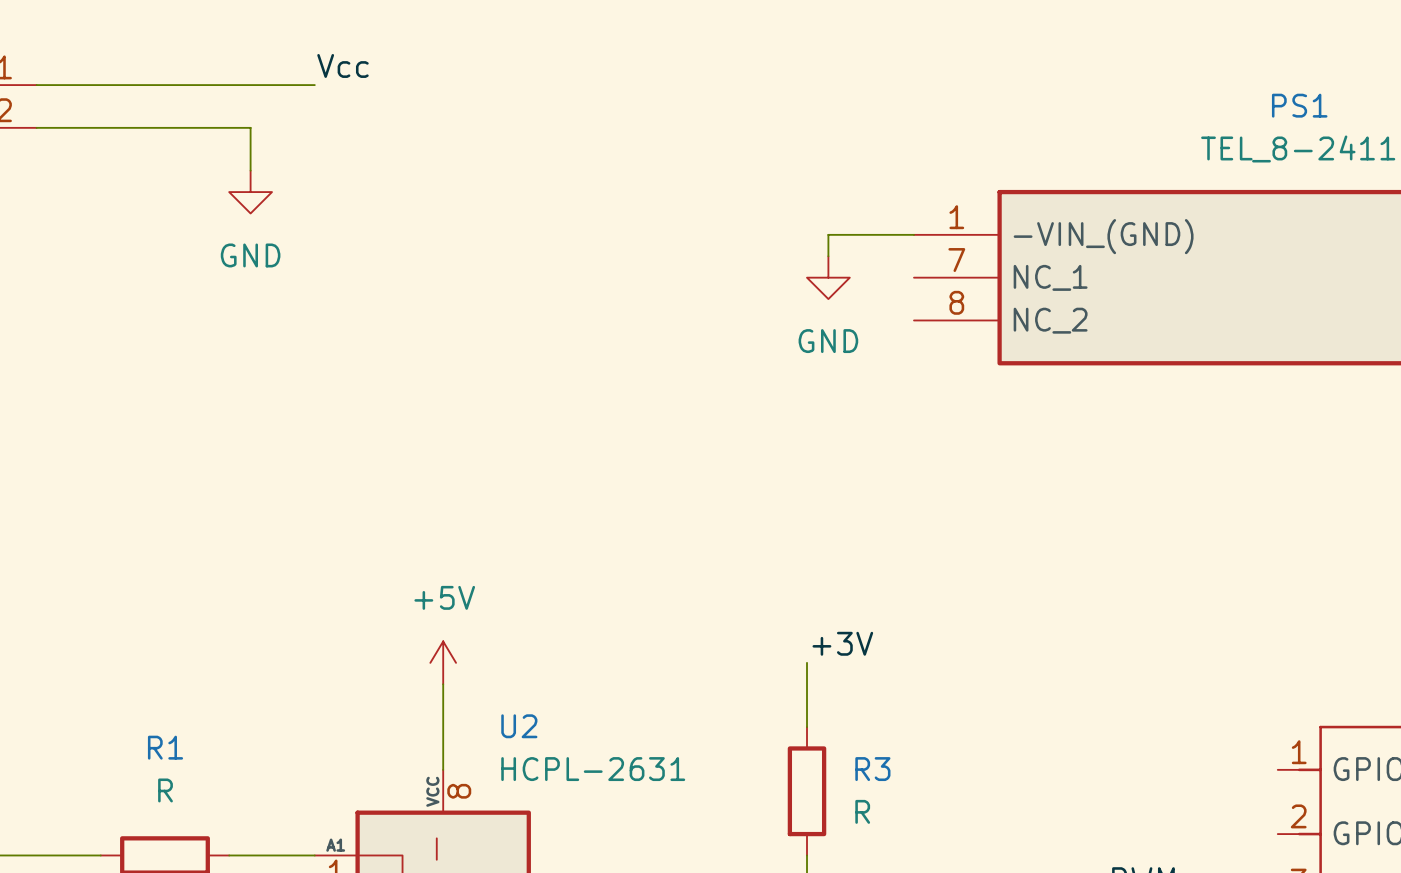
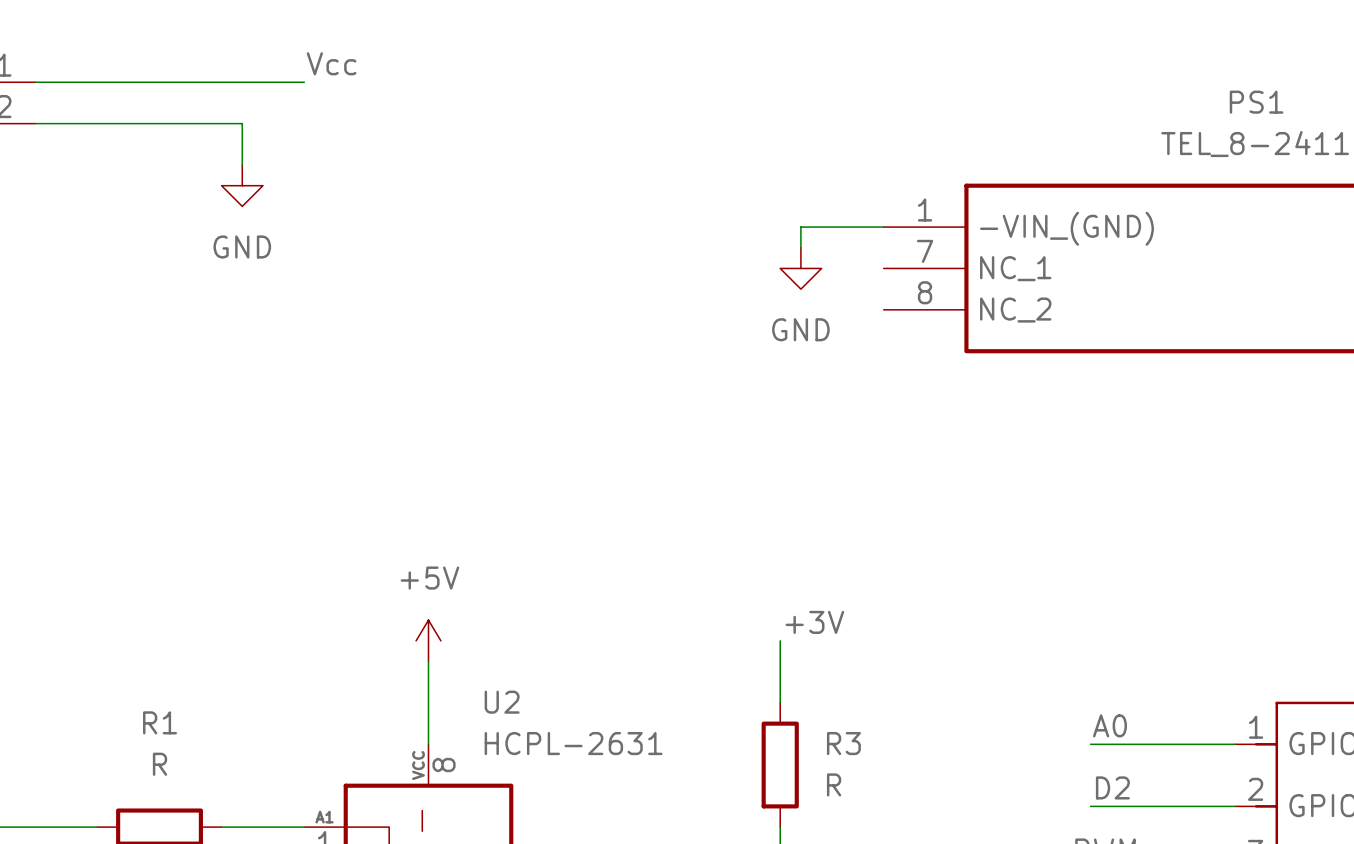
label: none -> A0 (1109, 725)
wire: none -> (1090, 744) (1235, 744)
label: none -> D2 (1112, 787)
wire: none -> (1090, 806) (1235, 806)

